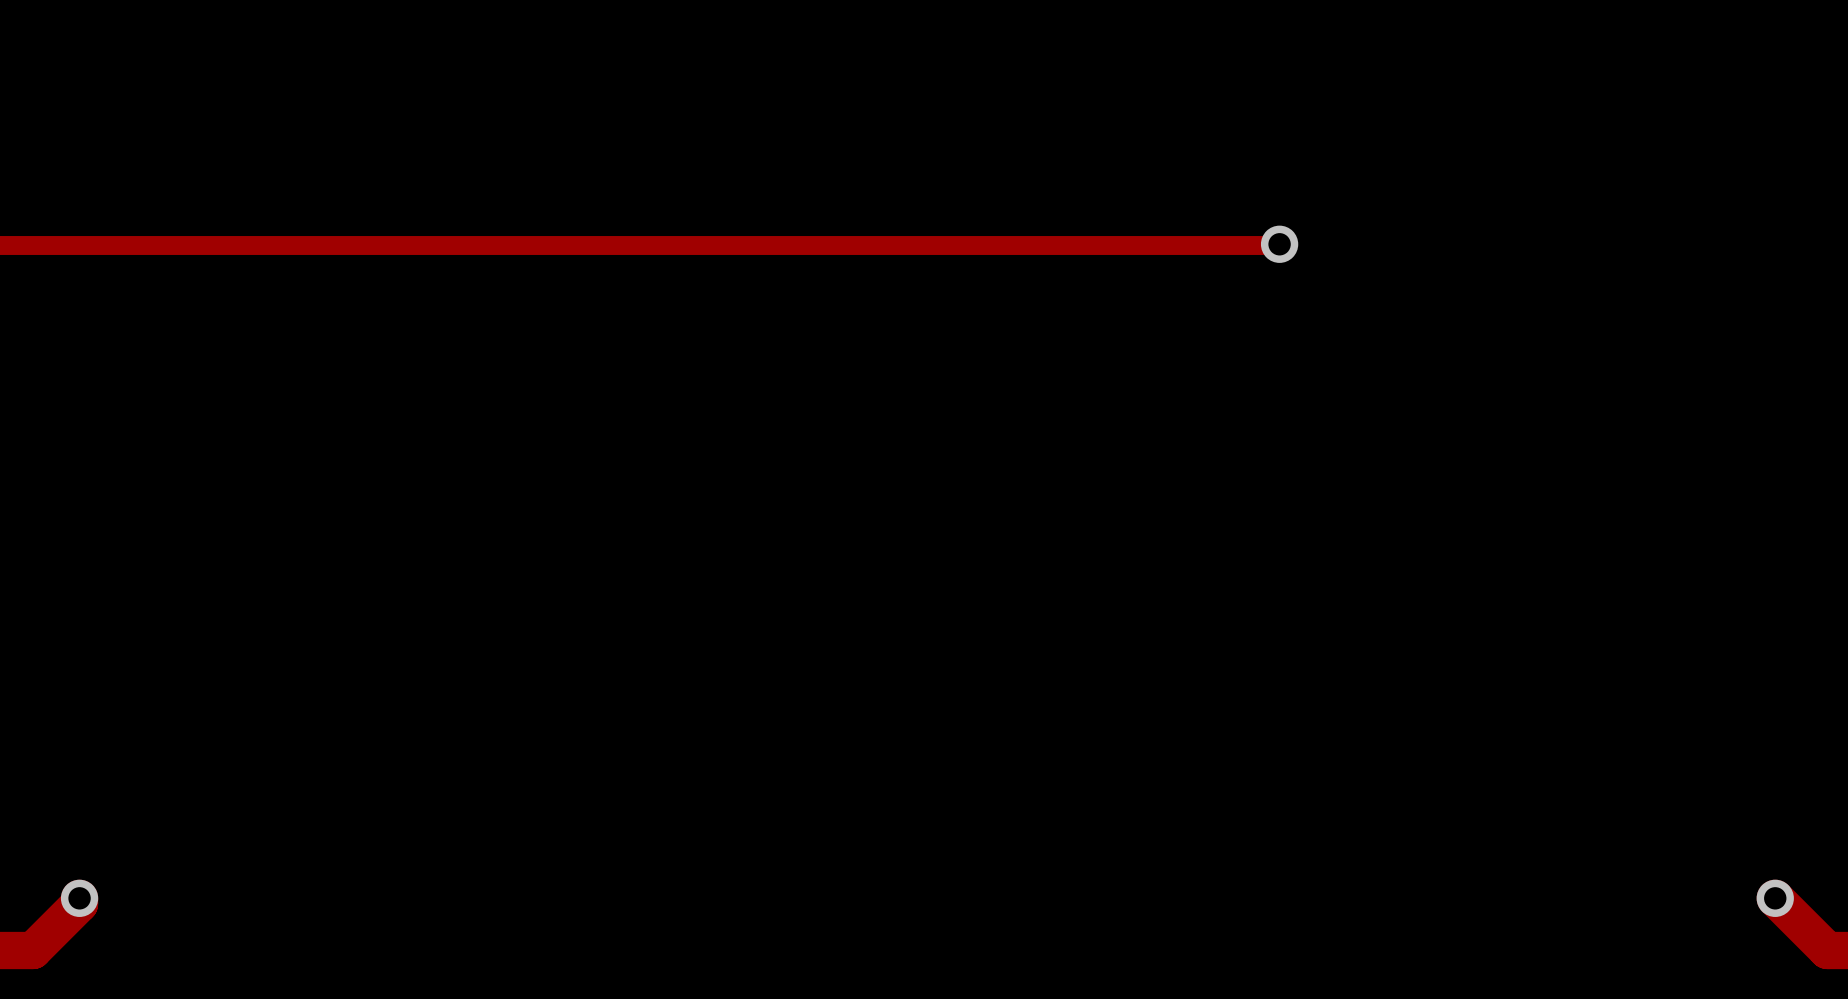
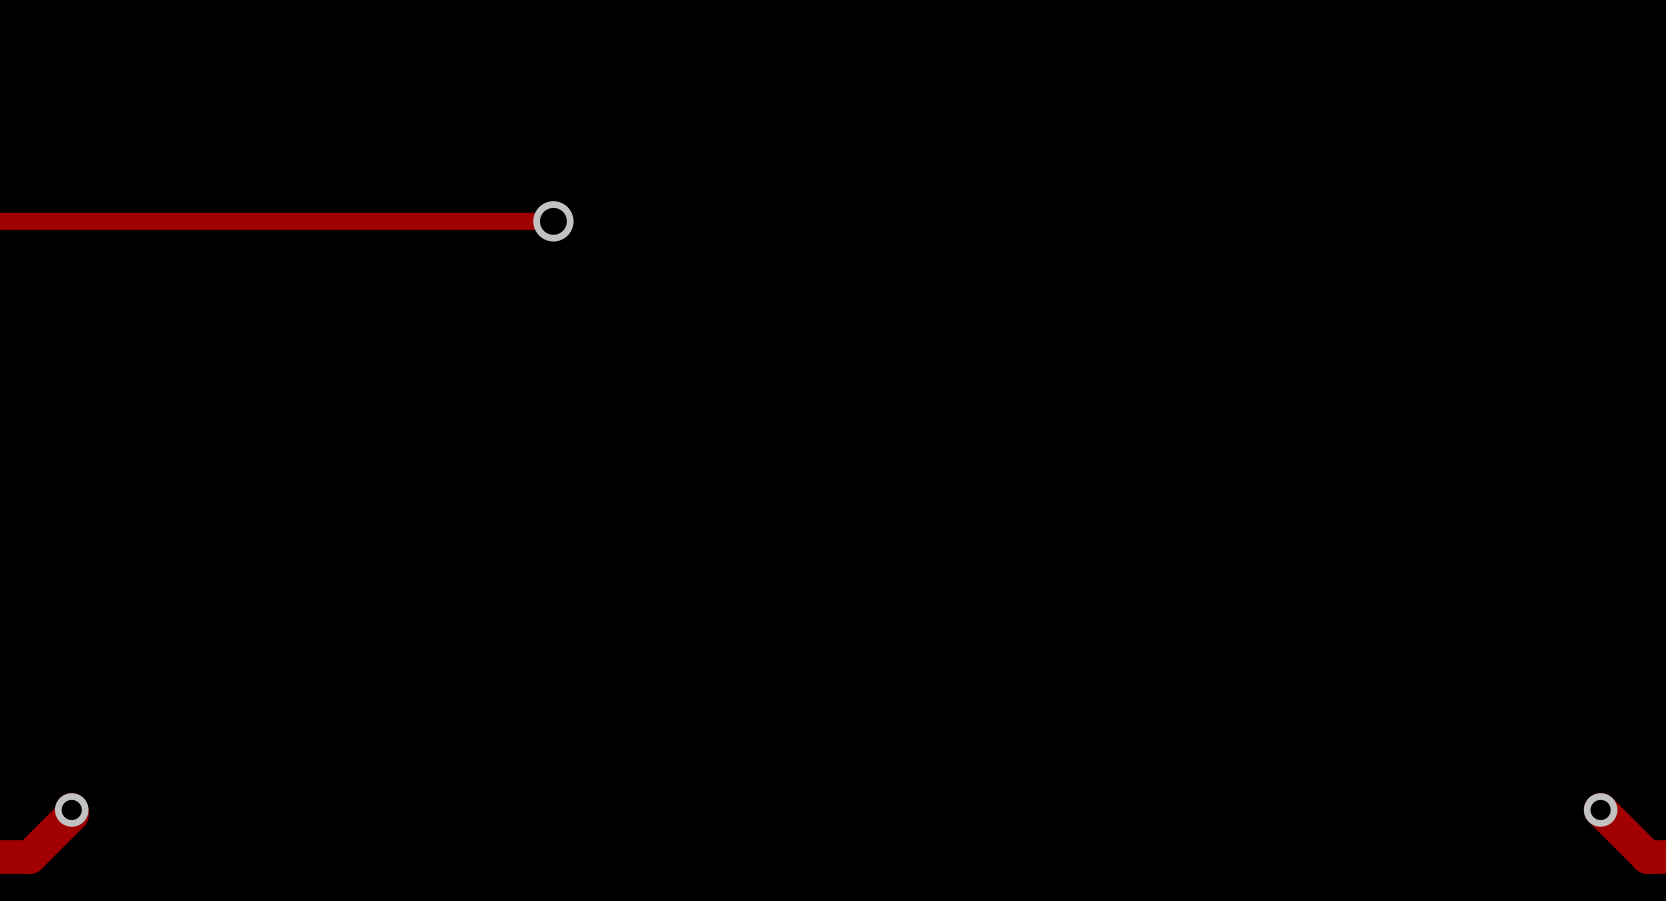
track: (1279, 244) (613, 245) -> none
via: (1279, 244) -> none
via: none -> (553, 221)

